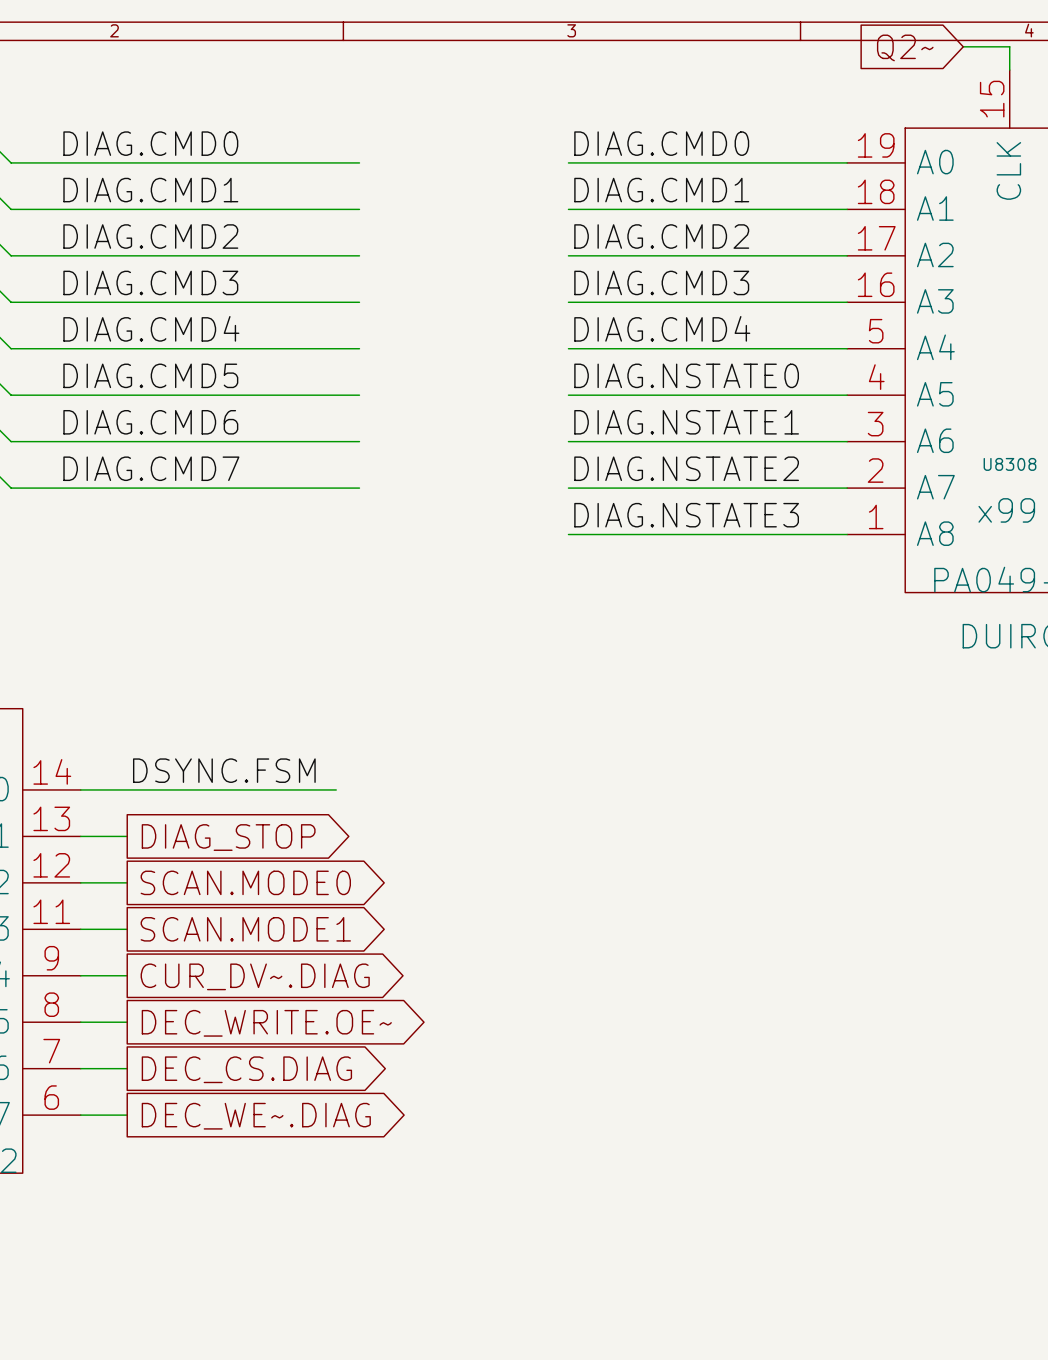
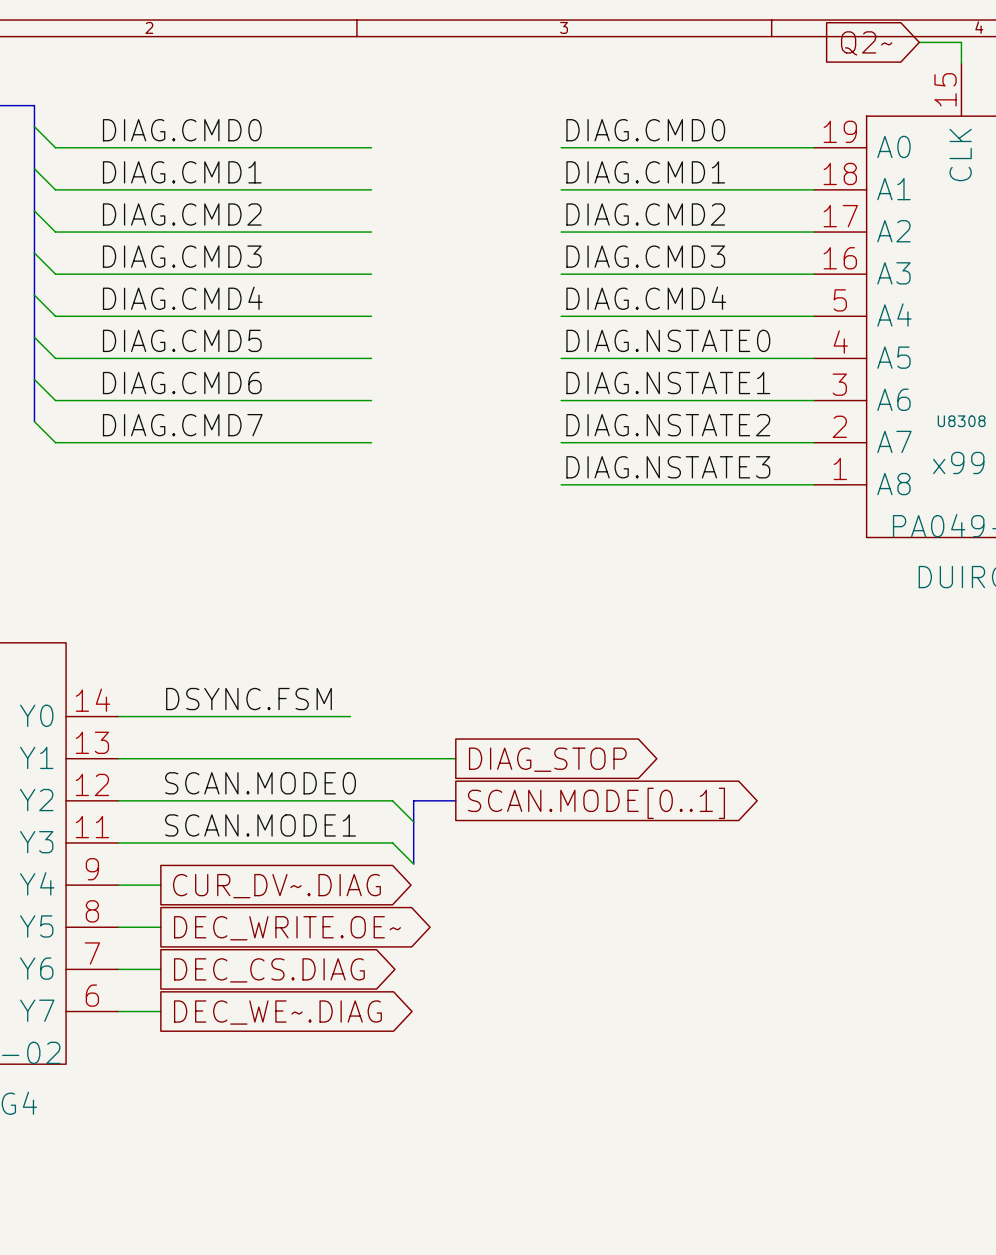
wire: none -> (160, 758) (455, 758)
global label: DIAG_STOP (228, 837) -> none
global label: none -> DIAG_STOP (547, 759)
label: none -> SCAN.MODE0 (260, 783)
wire: none -> (160, 800) (392, 800) (413, 821)
global label: SCAN.MODE0 (245, 882) -> none
bus: none -> (455, 800) (413, 800) (413, 864)
global label: none -> SCAN.MODE[0..1] (596, 803)
label: none -> SCAN.MODE1 (260, 825)
wire: none -> (160, 842) (392, 842) (413, 864)
global label: SCAN.MODE1 (245, 929) -> none

